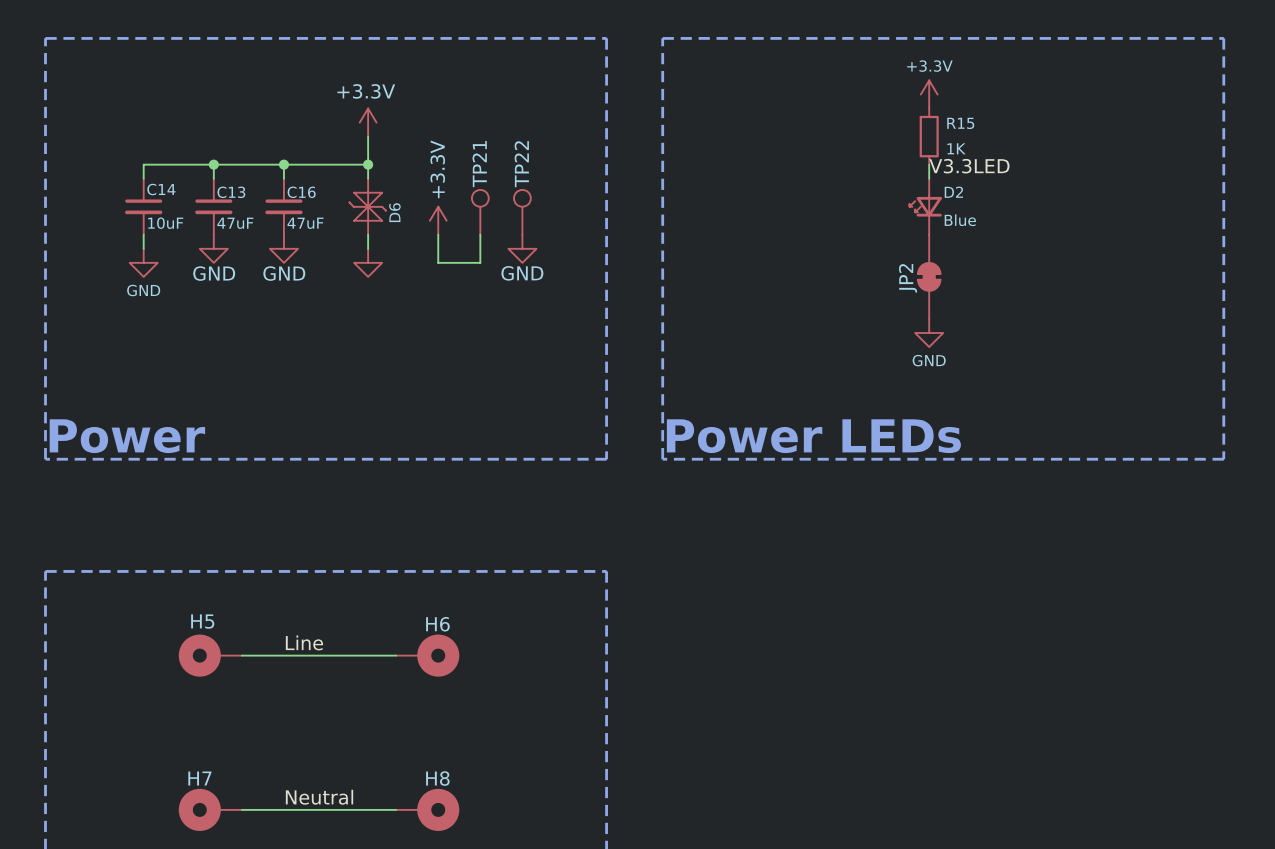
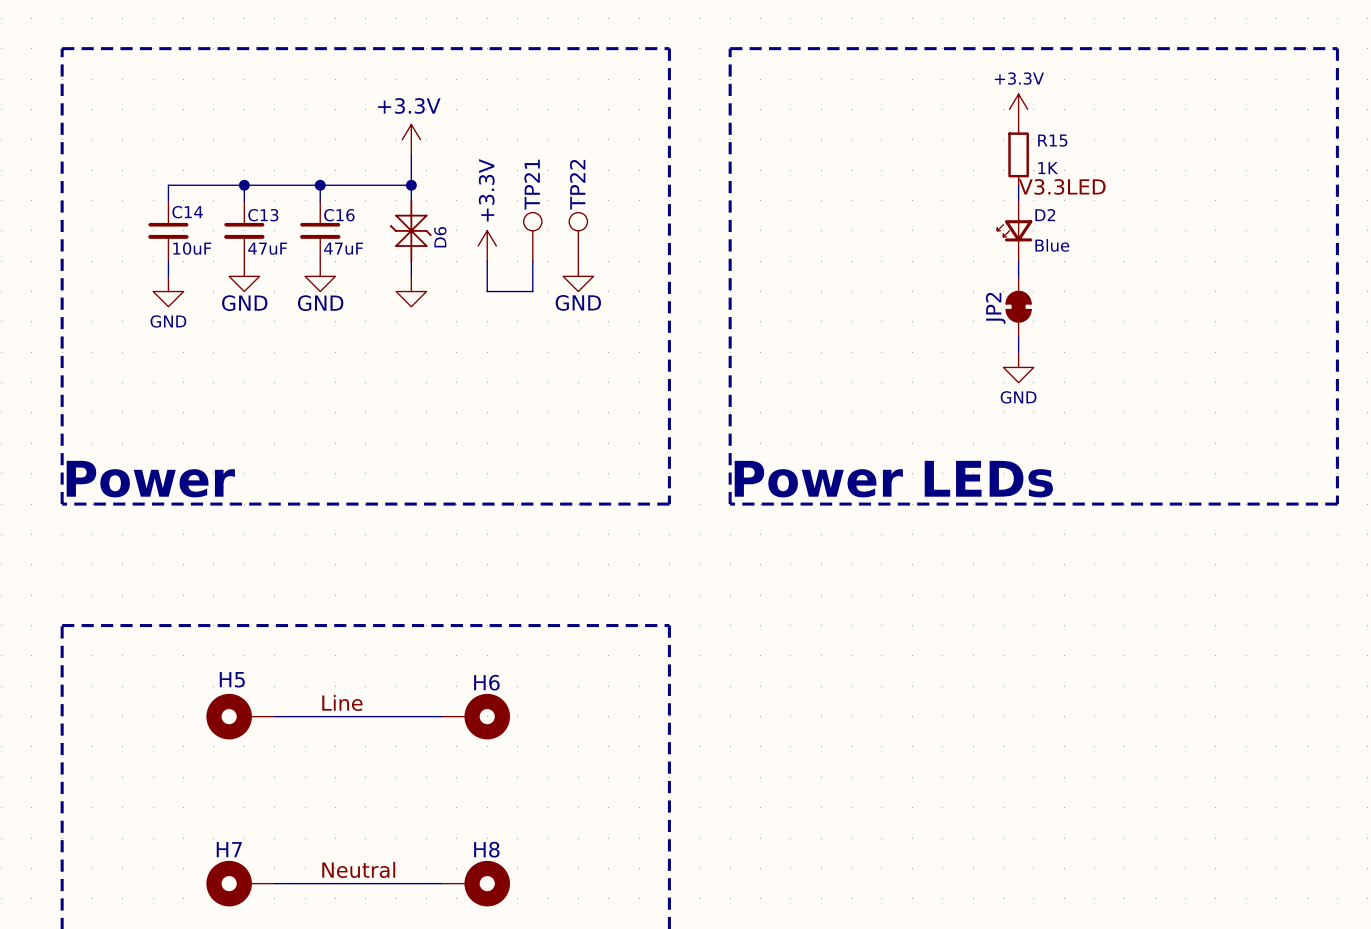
JP2 symbol: [917, 234, 941, 319] -> [1005, 276, 1032, 338]

